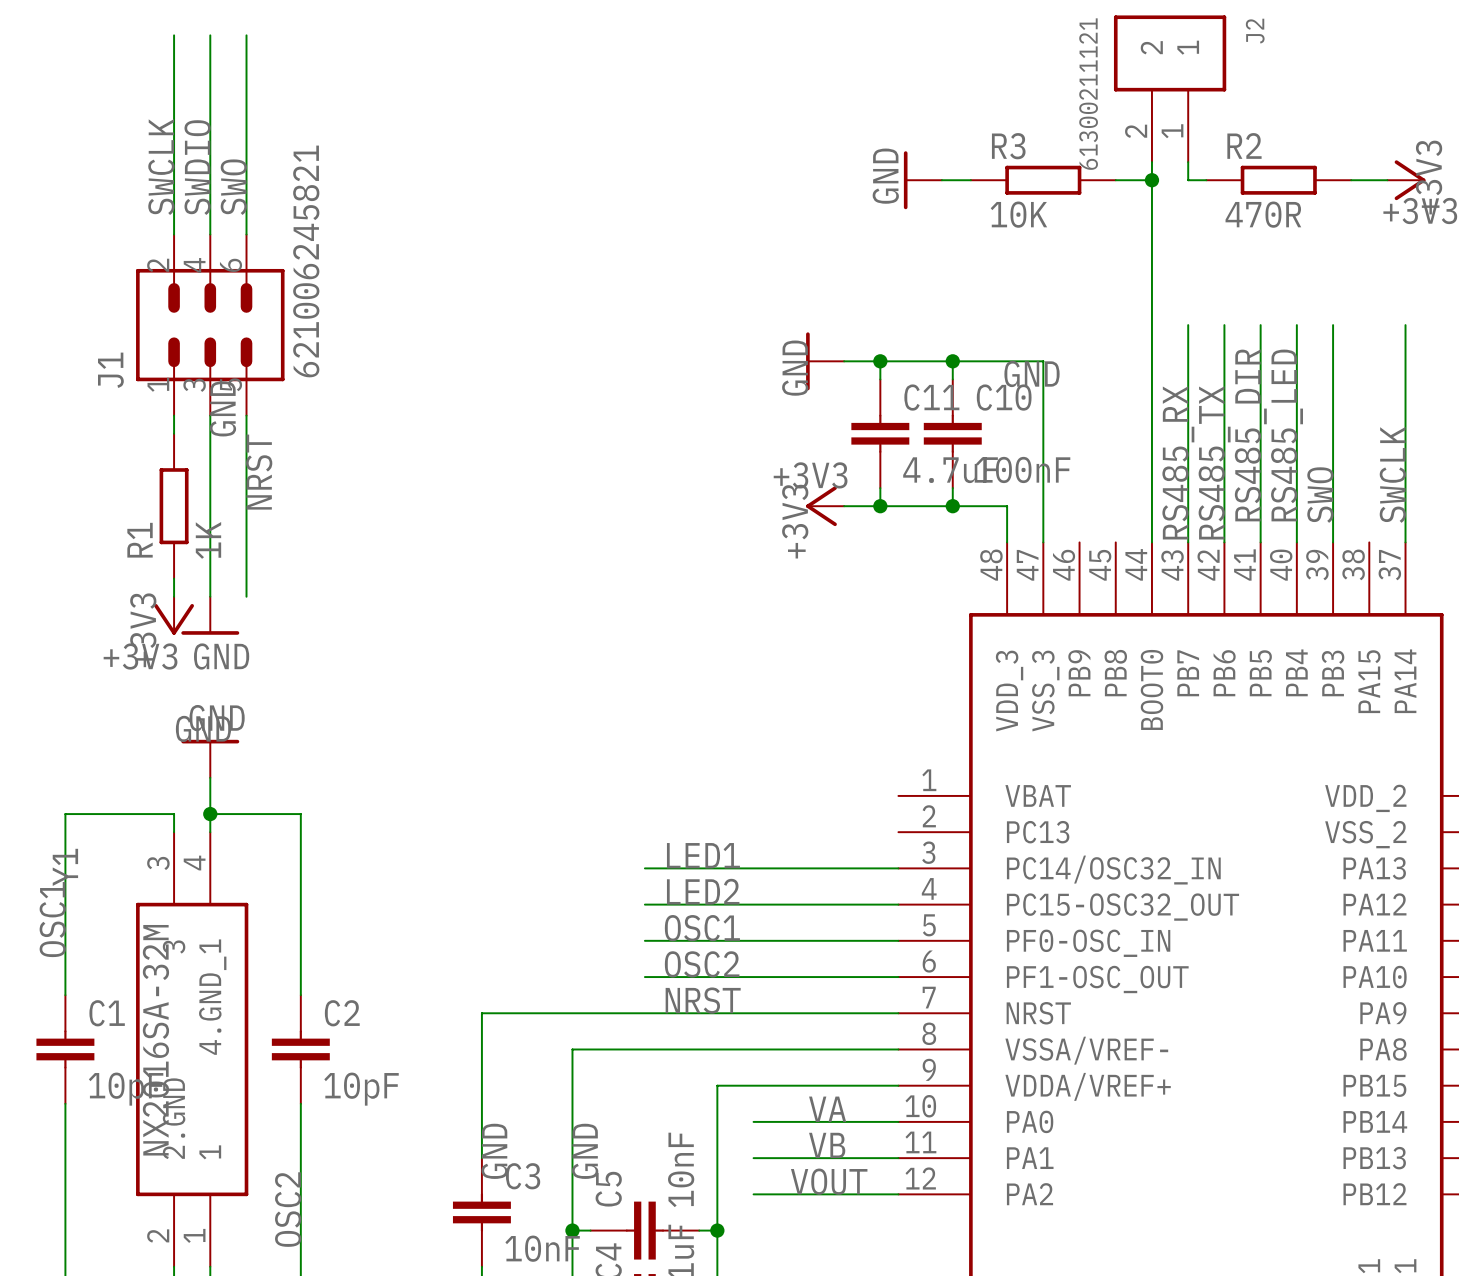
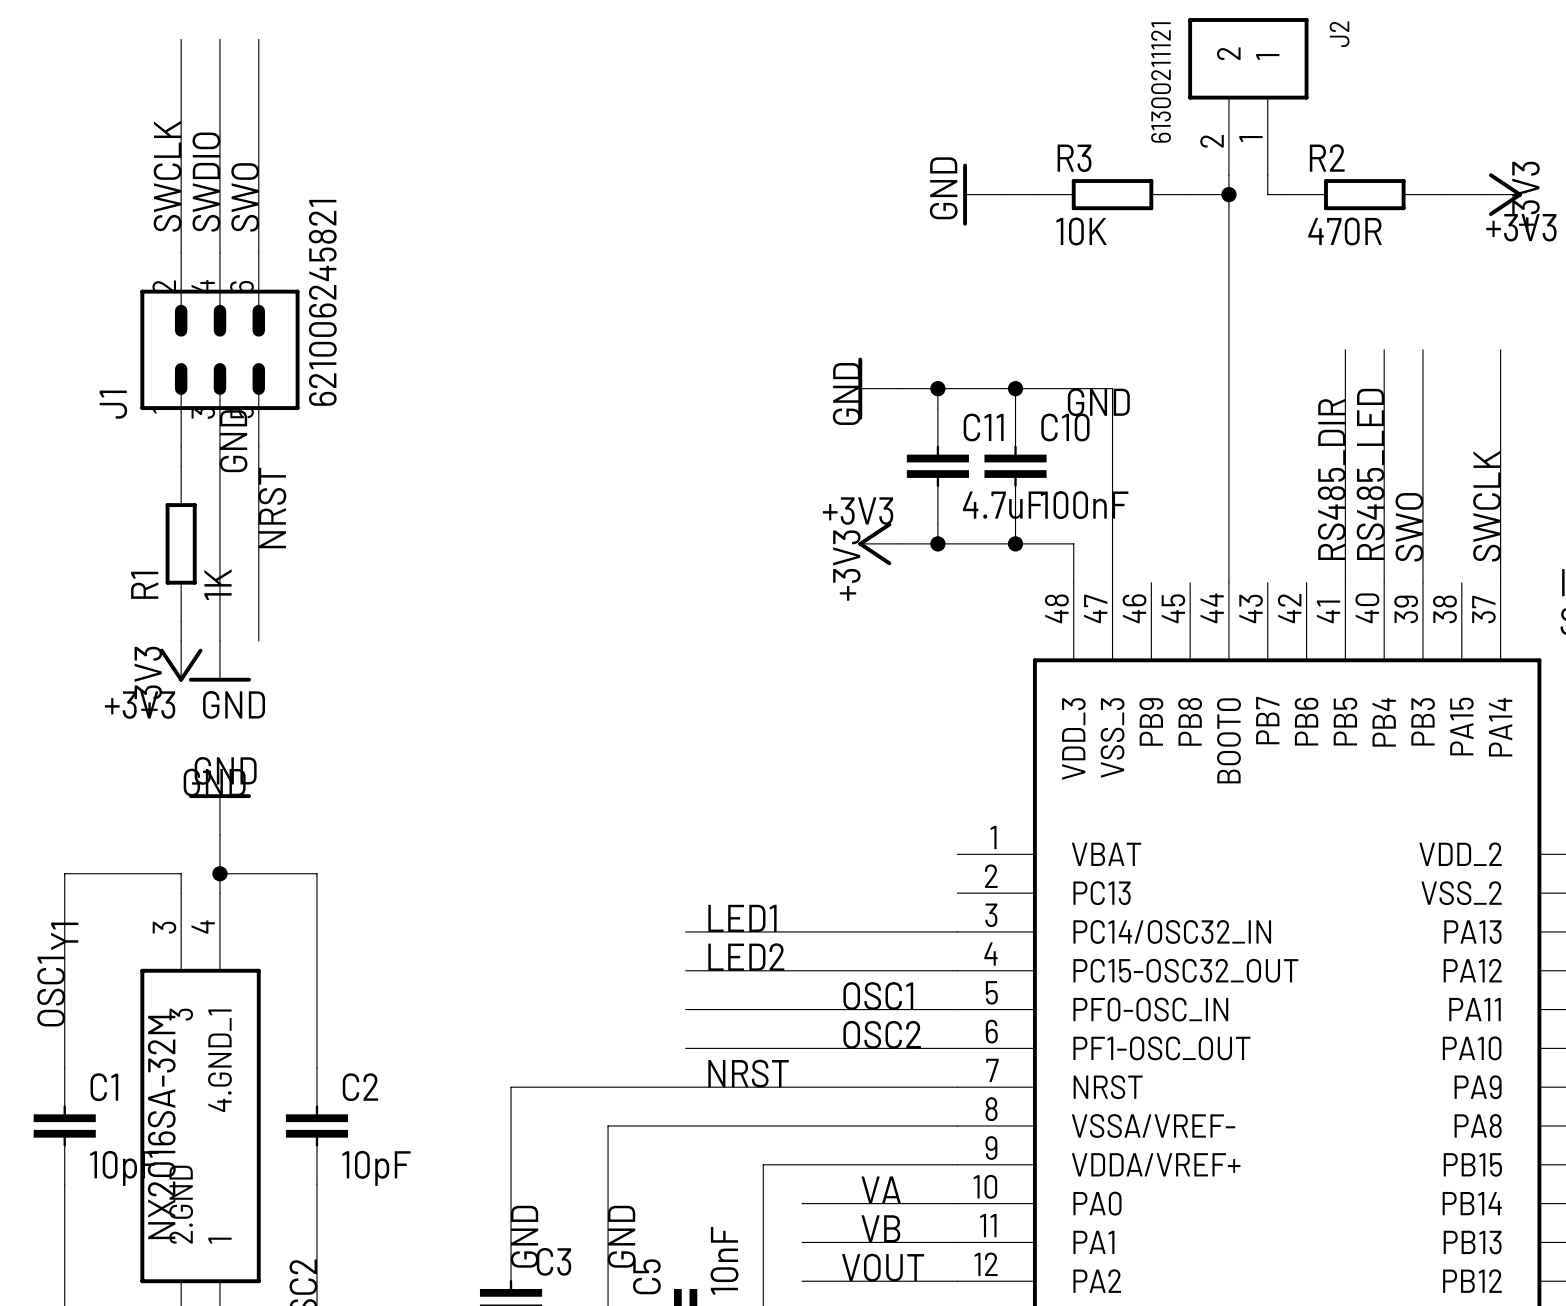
wire: (1188, 325) (1188, 542) -> none
wire: (1224, 325) (1224, 542) -> none
label: RS485_RX (1178, 462) -> none
label: RS485_TX (1214, 462) -> none
label position: OSC1 (702, 928) -> OSC1 (878, 996)
label position: OSC2 (702, 964) -> OSC2 (882, 1034)

